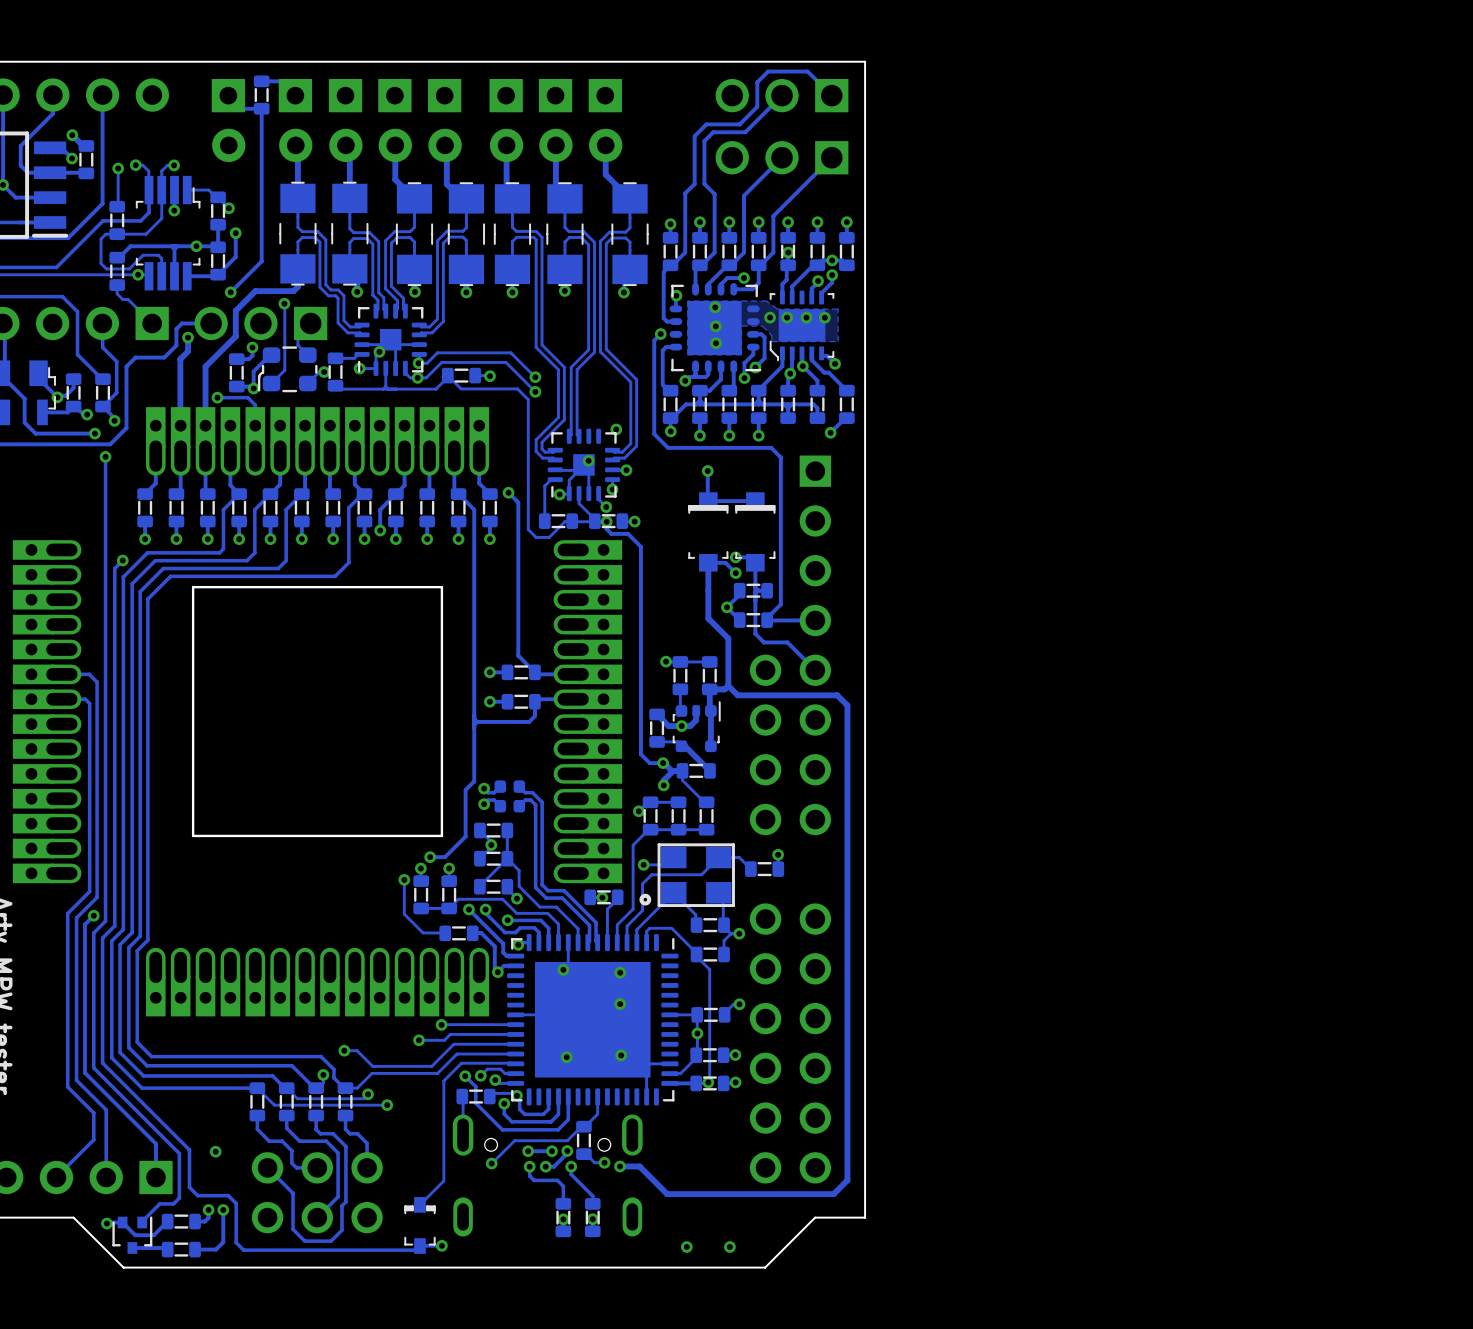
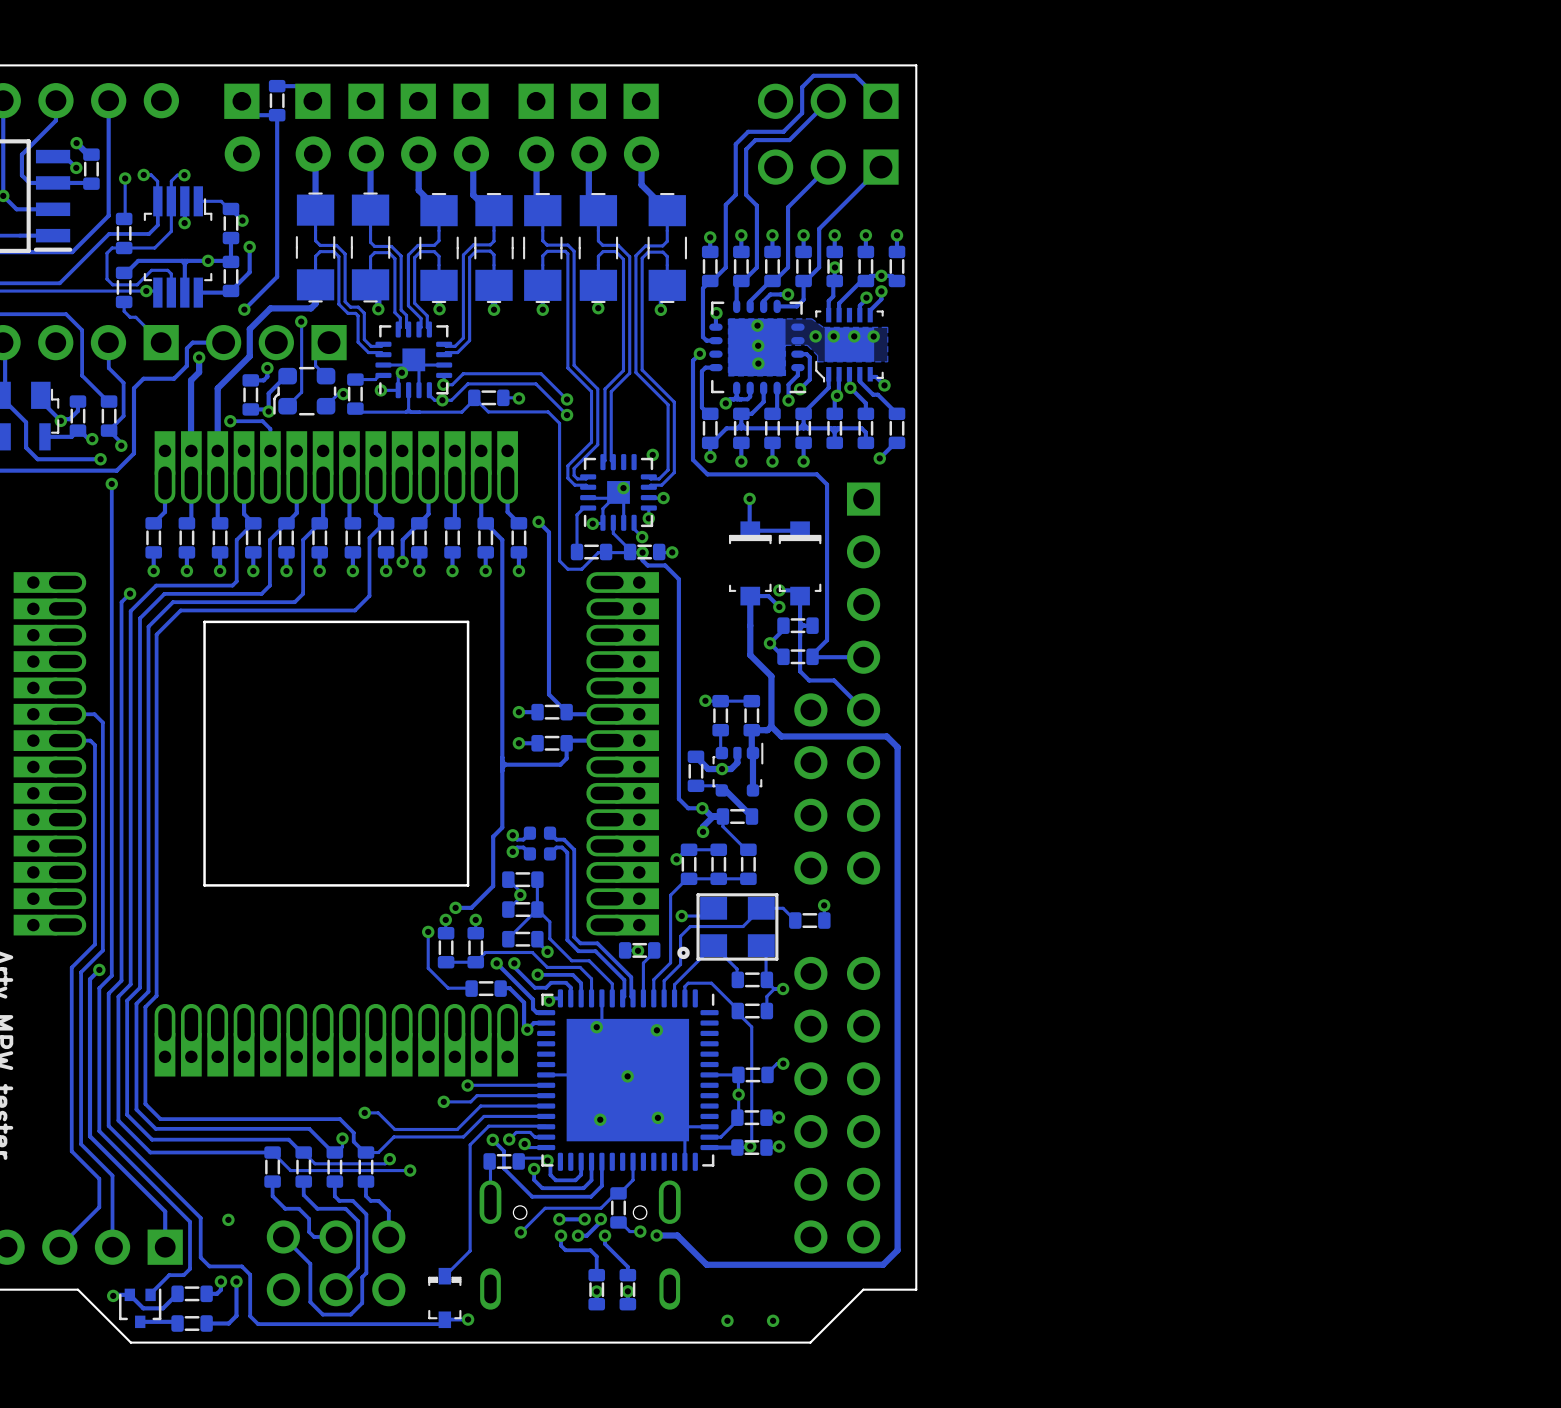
via position: (620, 1004) -> (627, 1076)

